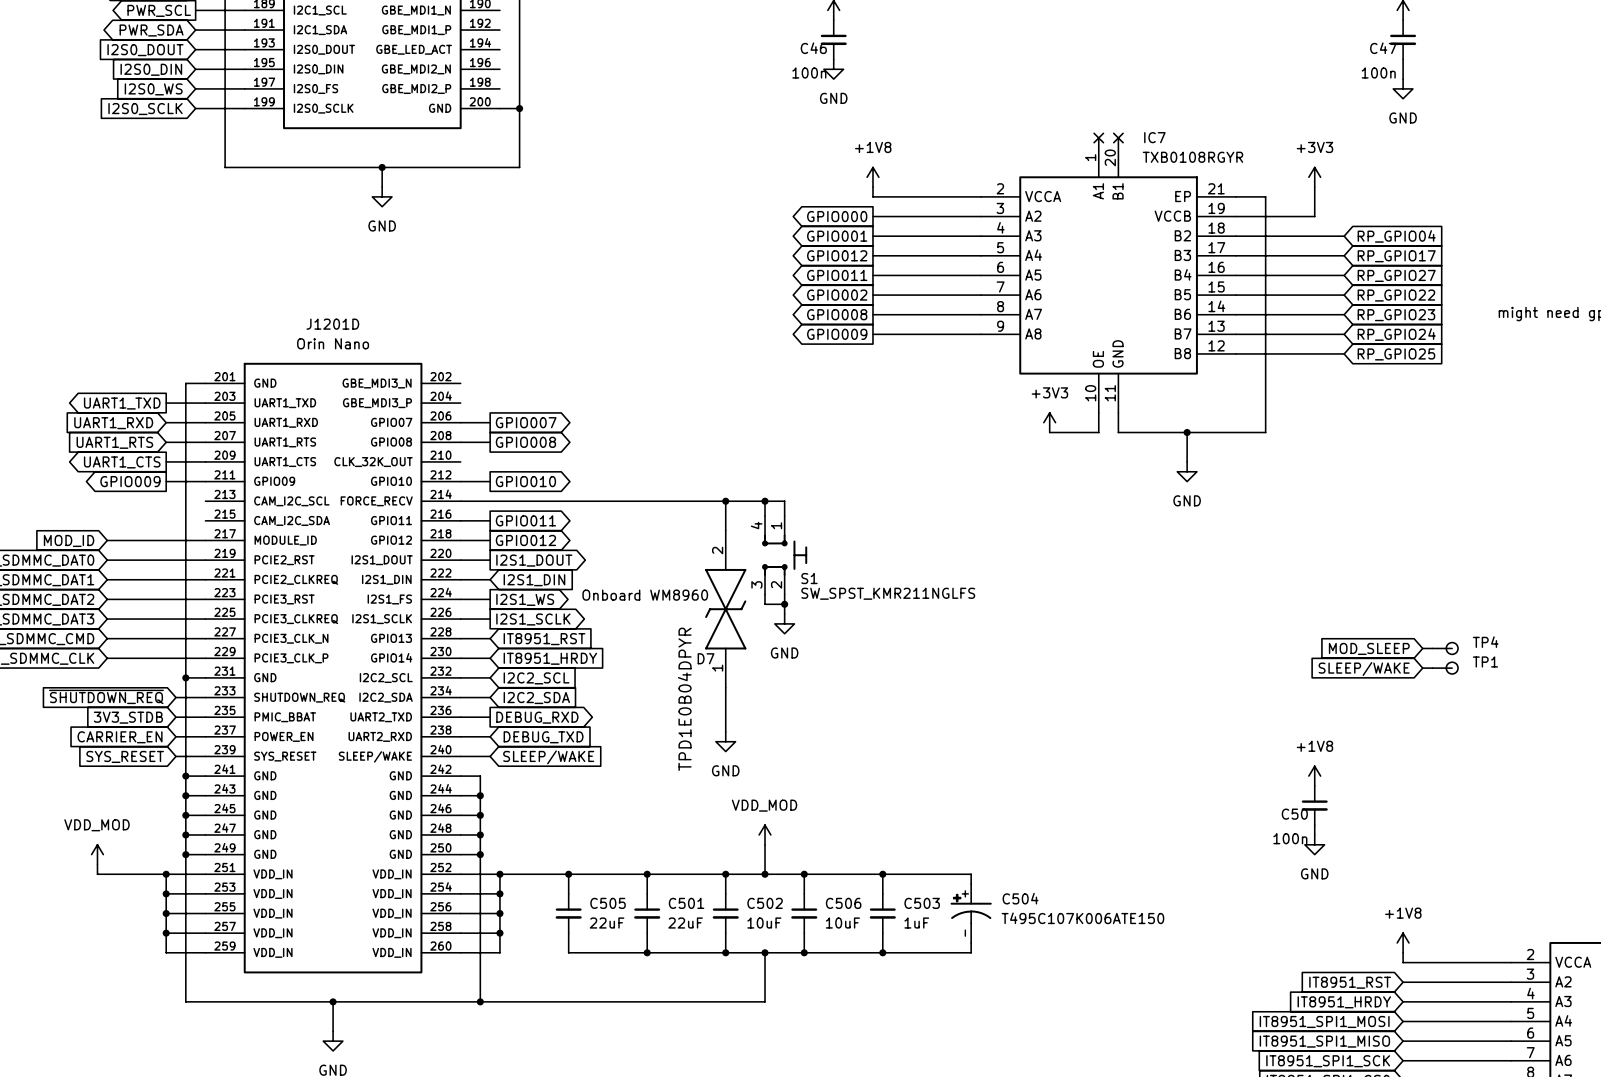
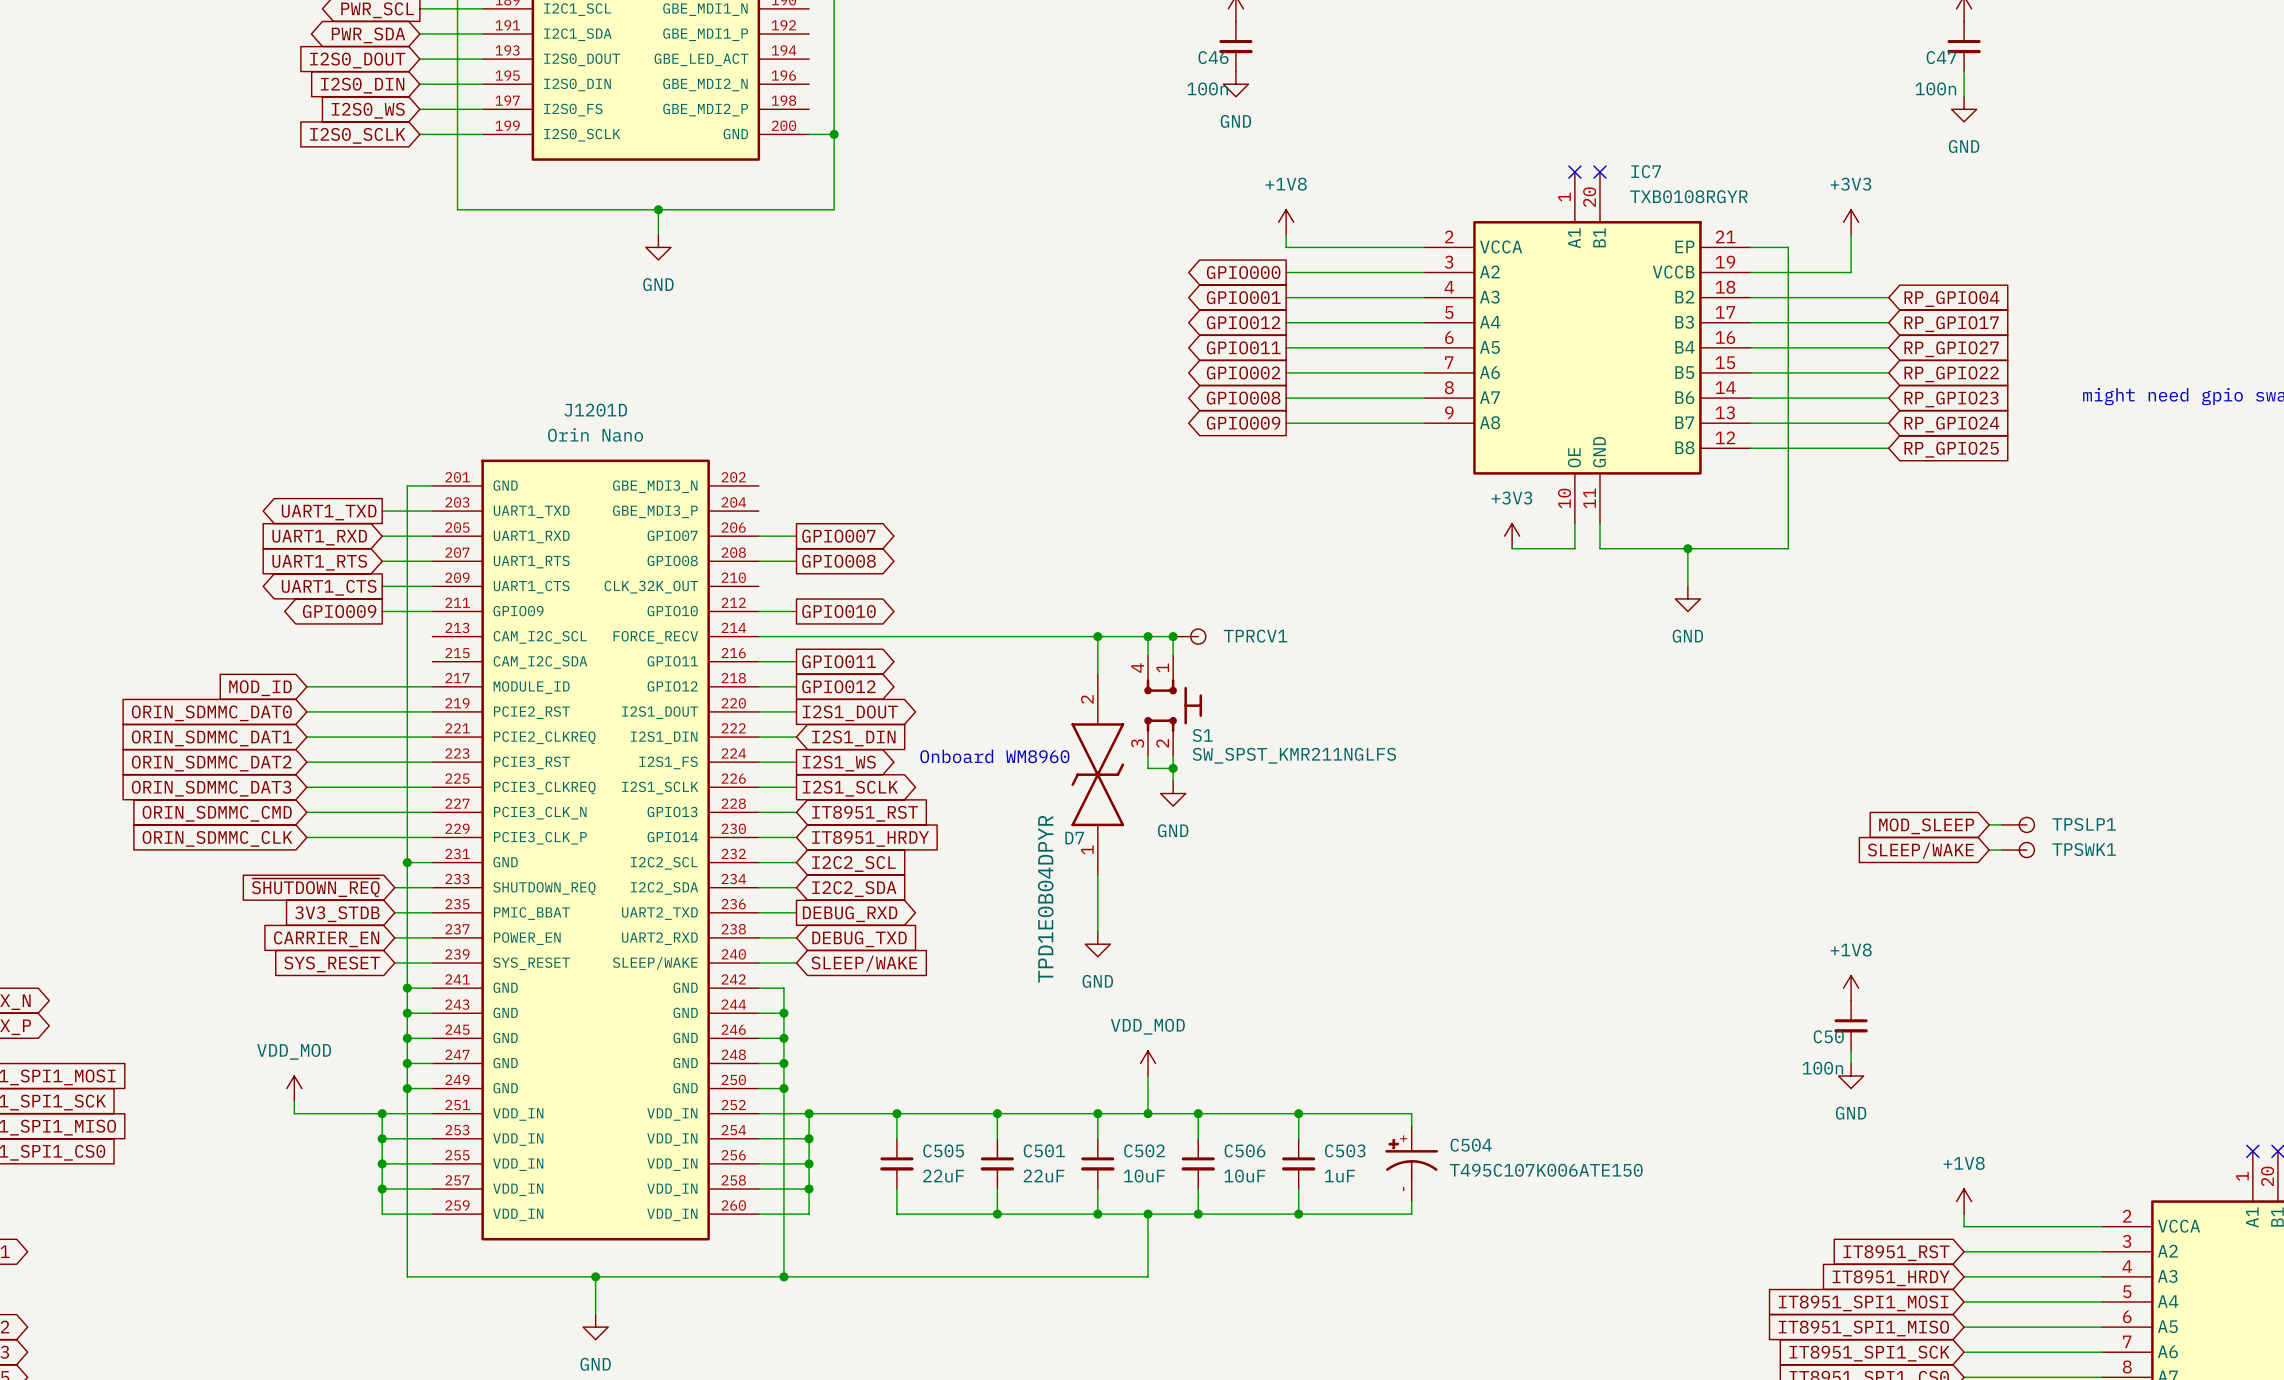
junction: none -> (1173, 636)
TPRCV1: none -> (1189, 636)
TP4 name: TP4 (1485, 642) -> TPSLP1 (2084, 824)
TP1 name: TP1 (1485, 661) -> TPSWK1 (2084, 849)

